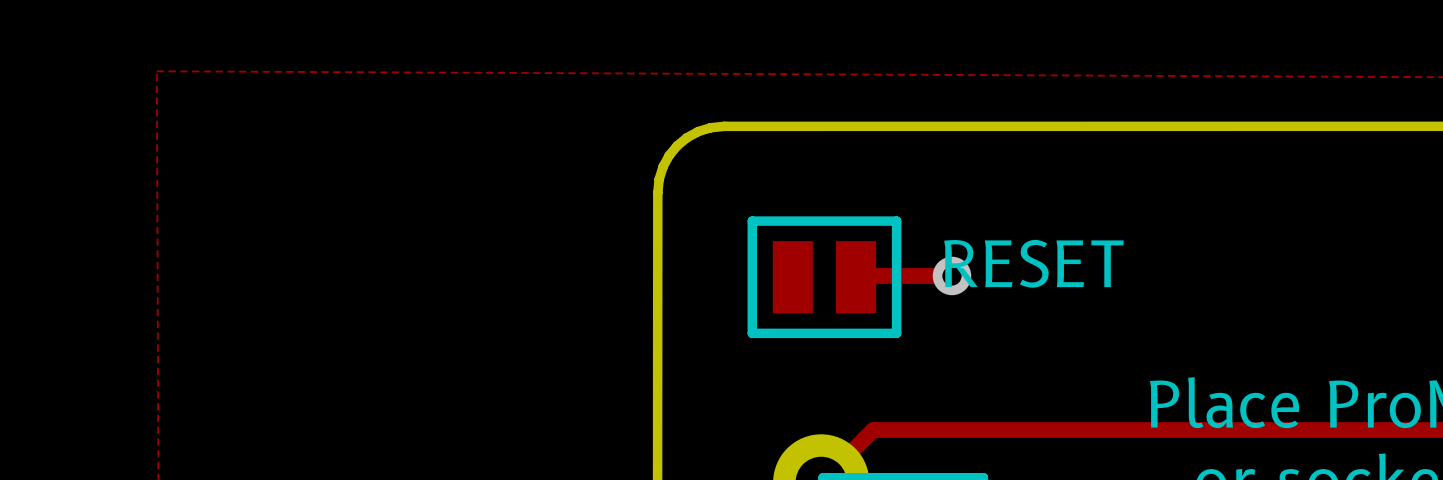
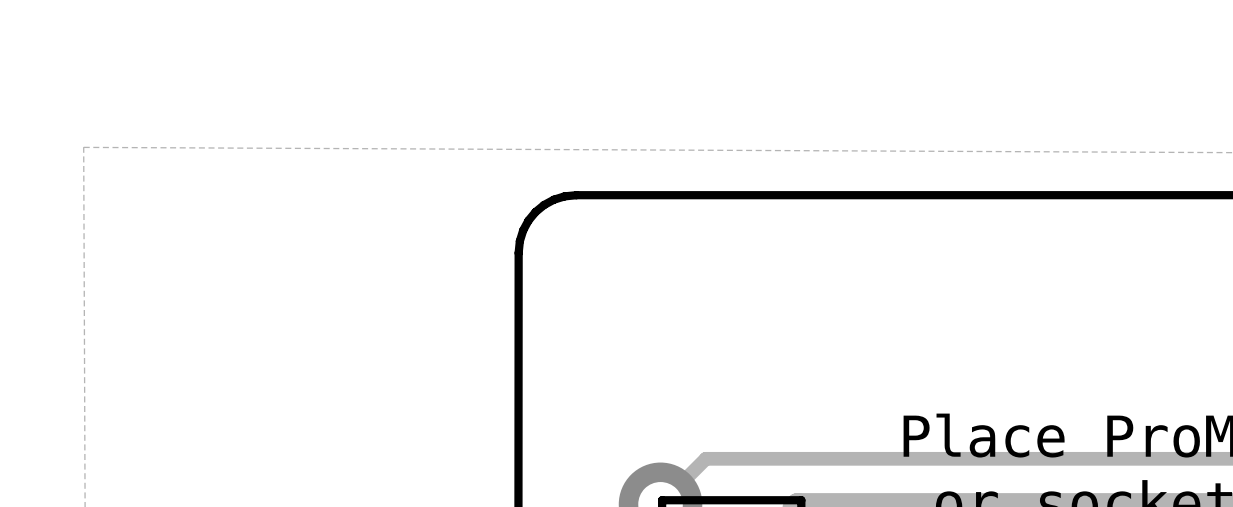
text: RESET (1033, 263) -> none
track: (857, 275) (951, 275) -> none
via: (951, 275) -> none
part: (824, 277) -> none

